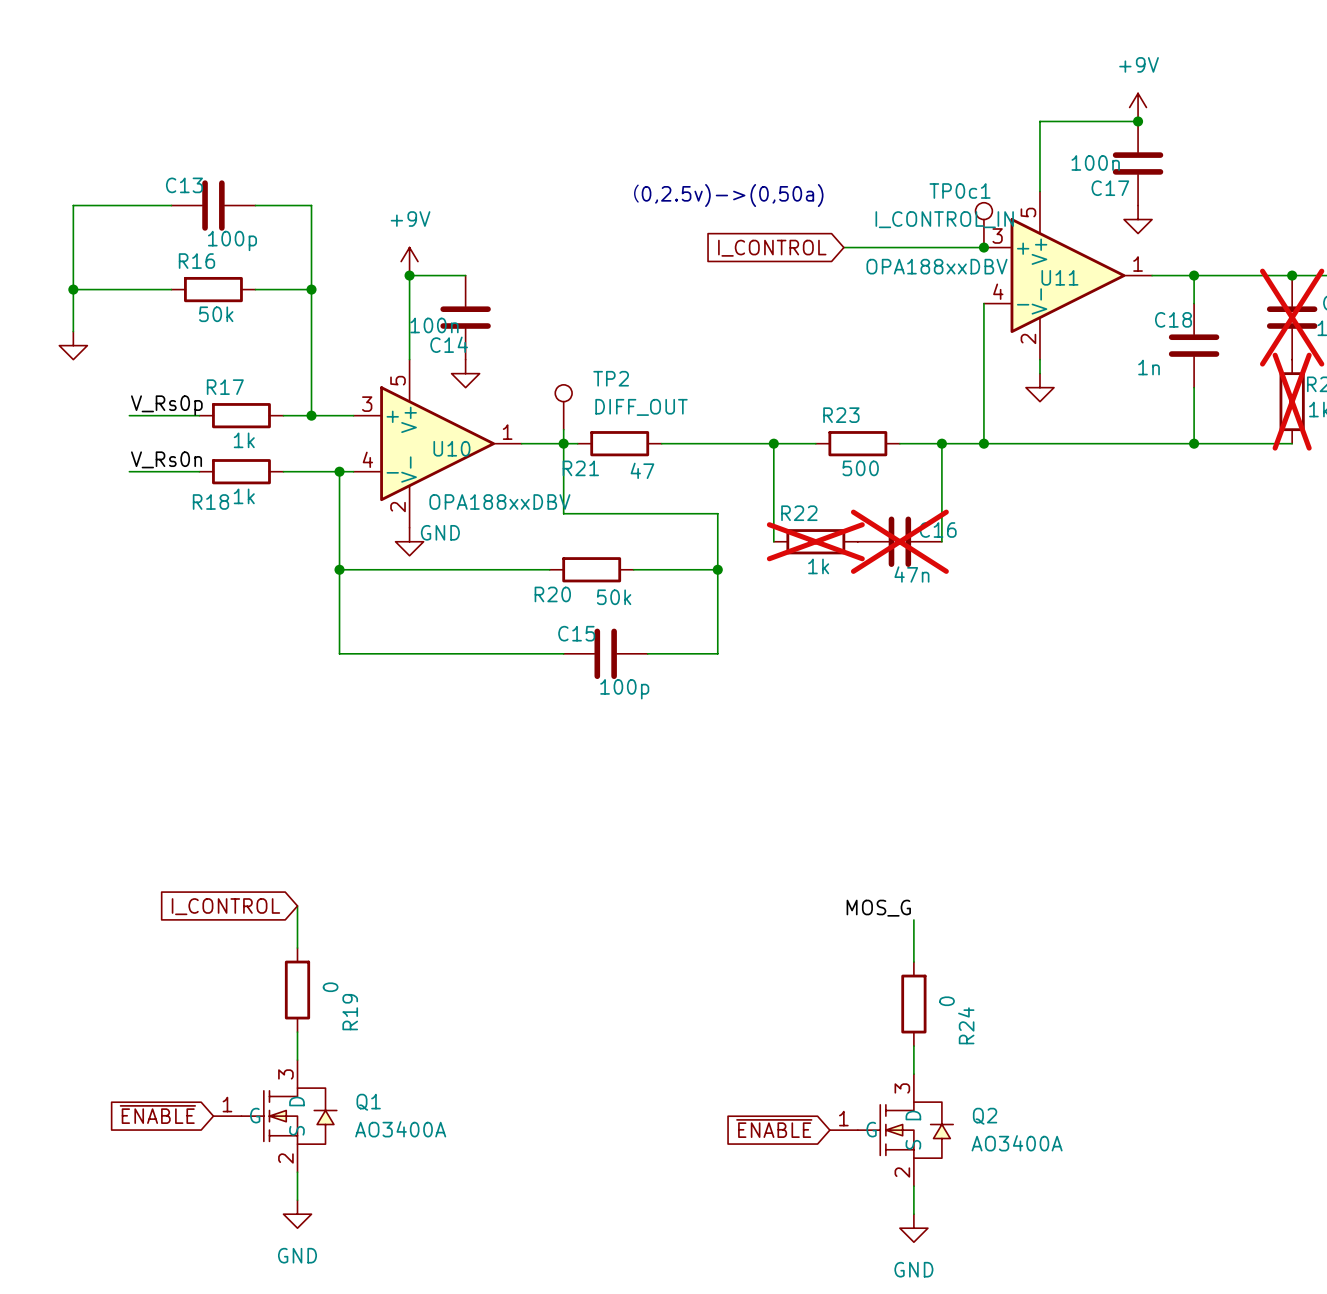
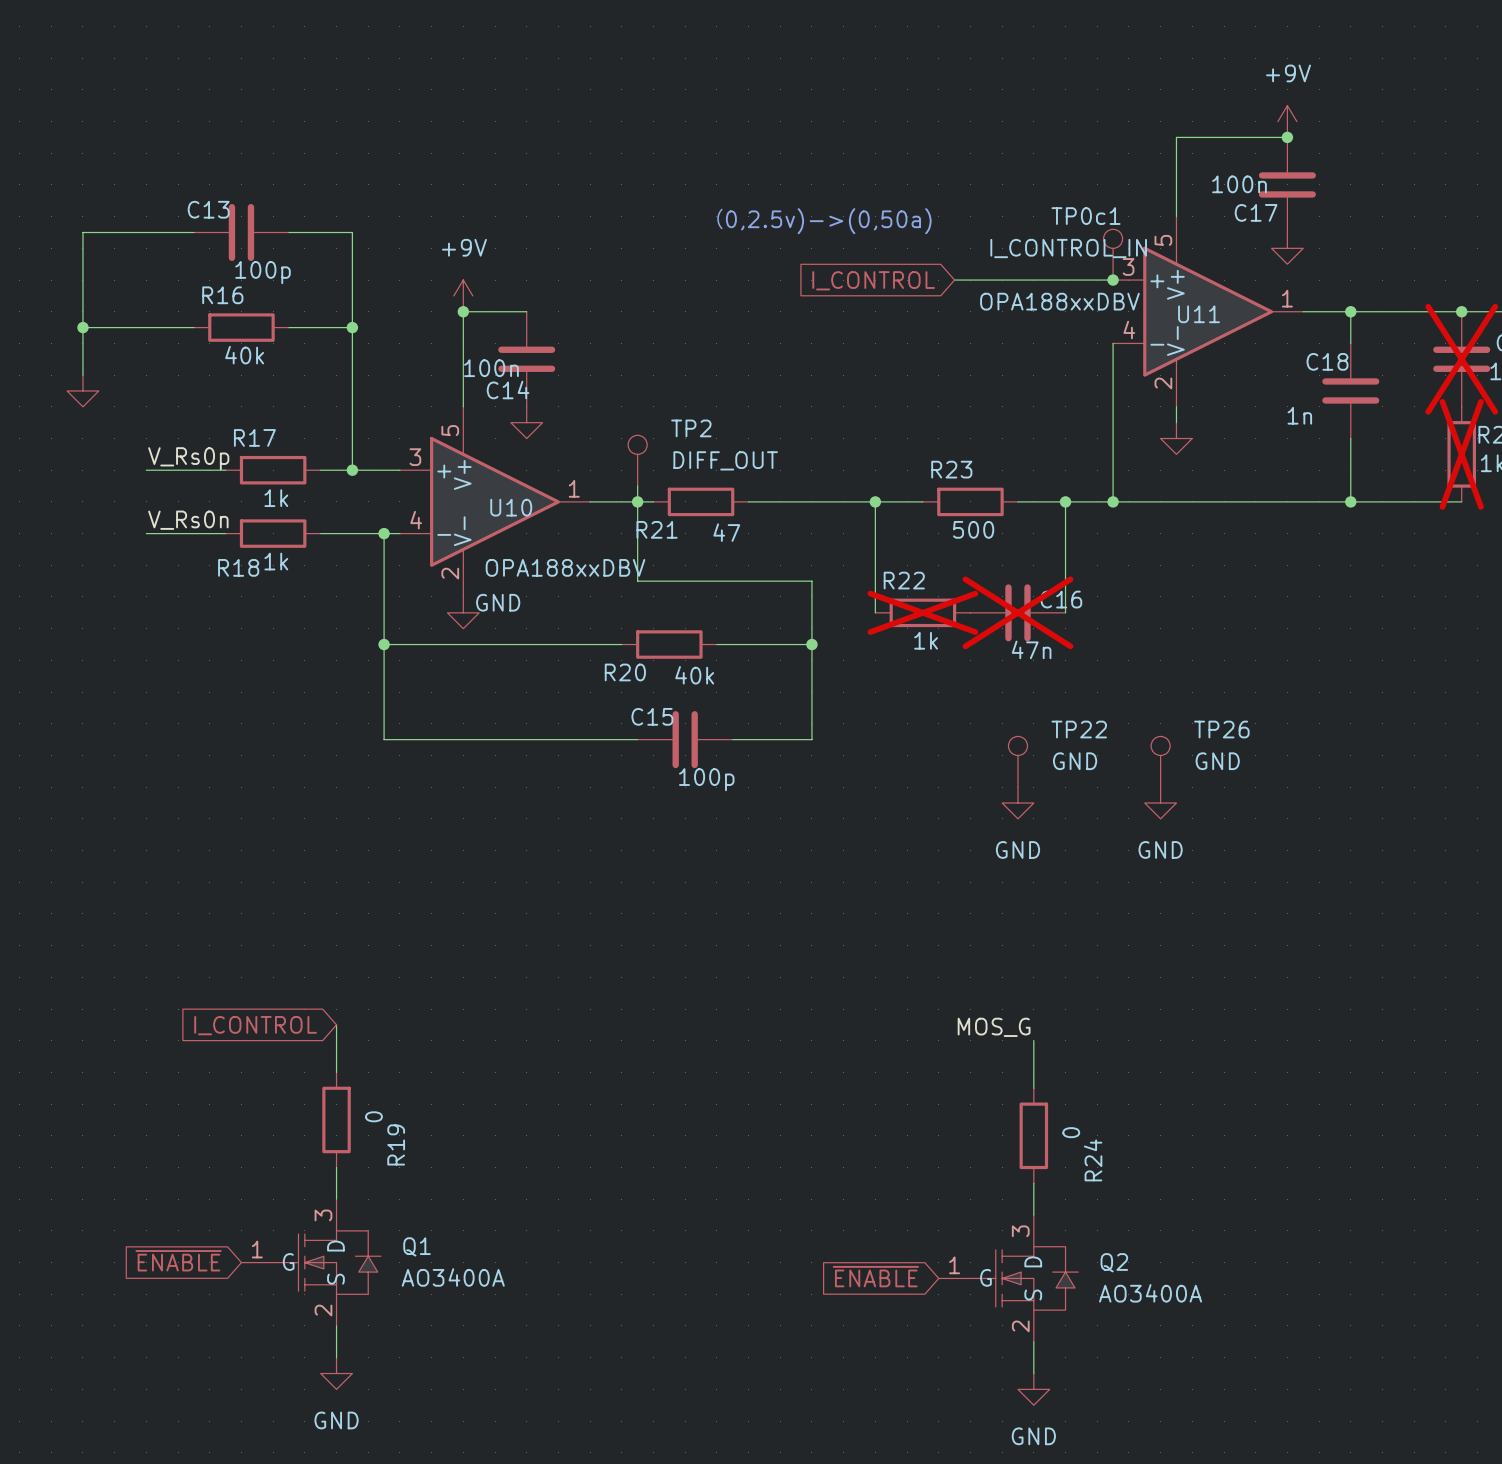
R16 value: 50k (216, 314) -> 40k (244, 355)
R20 value: 50k (614, 597) -> 40k (694, 675)
TP22: none -> GND (1017, 761)
TP26: none -> GND (1160, 761)
power symbol: none -> GND (1017, 803)
power symbol: none -> GND (1160, 803)

